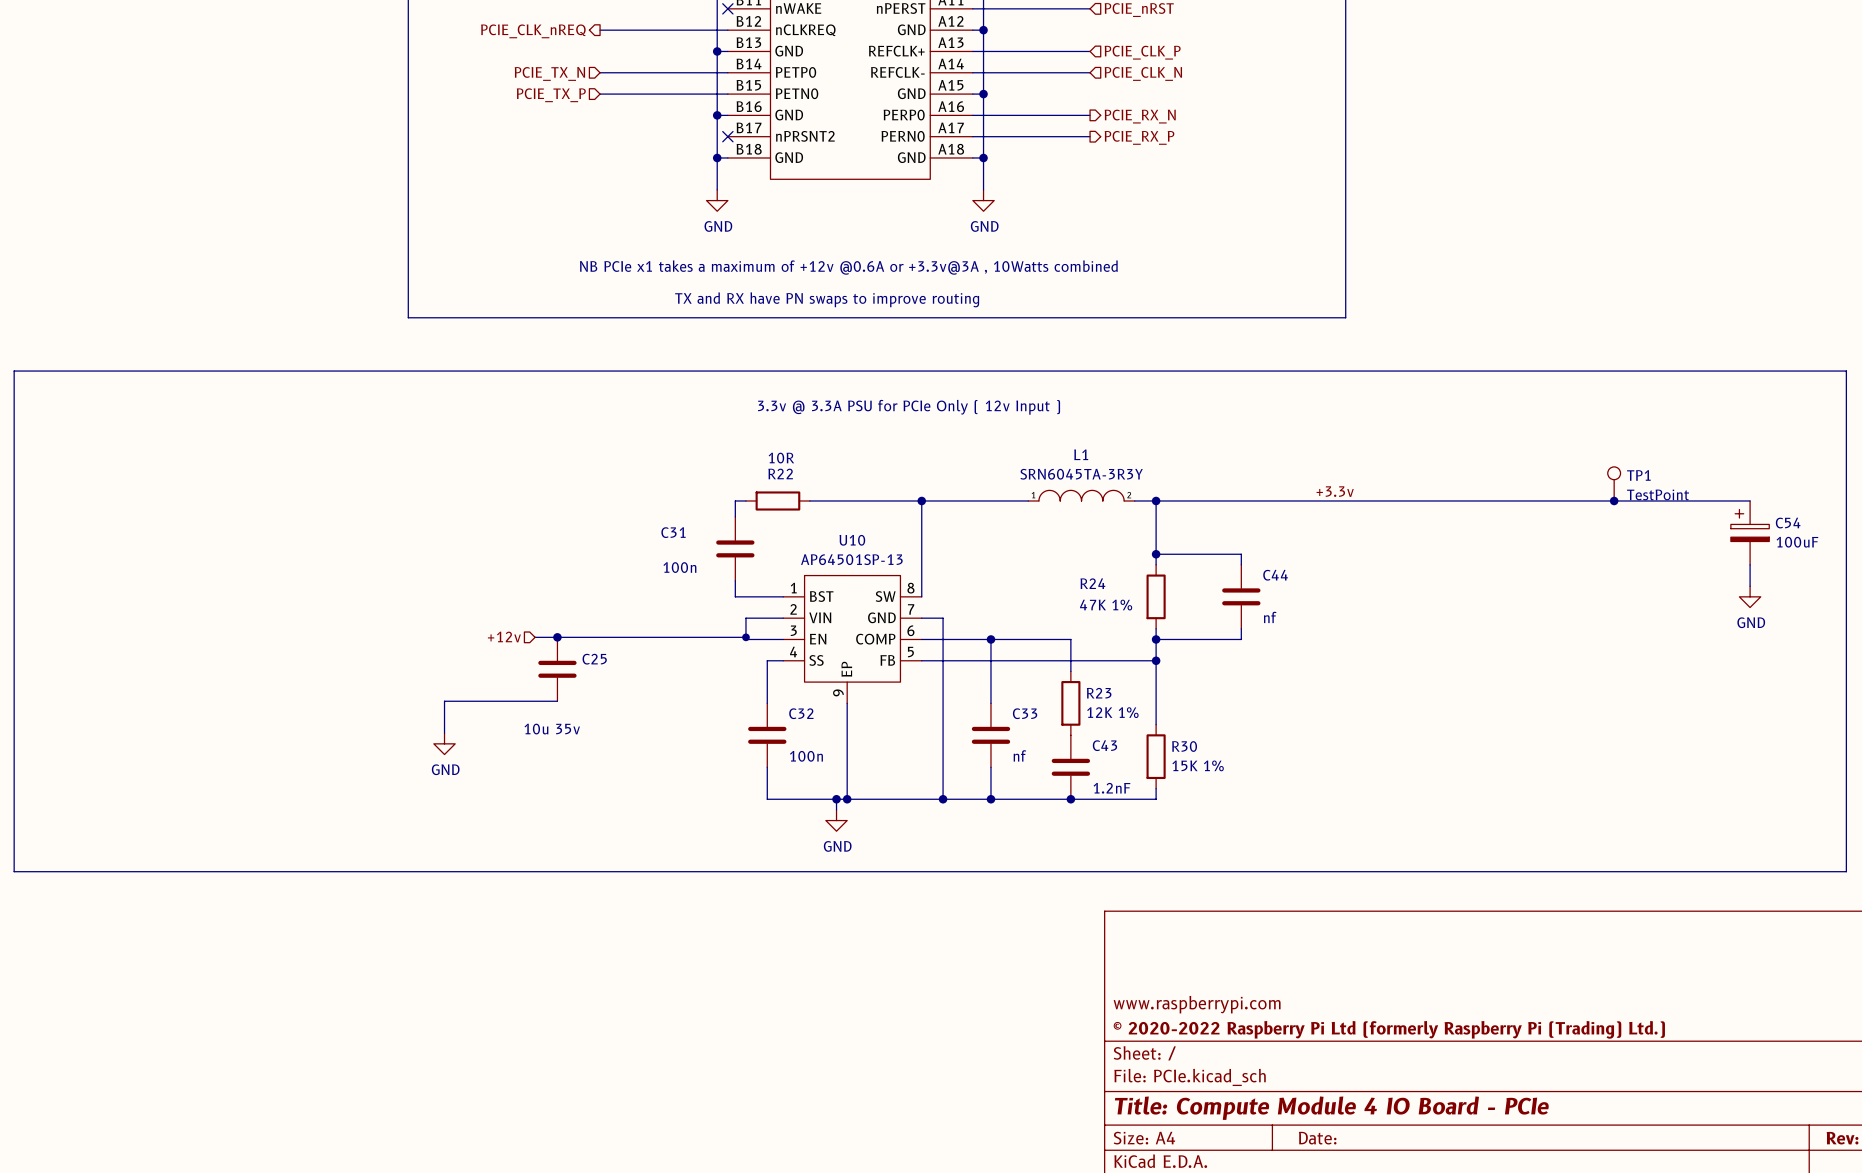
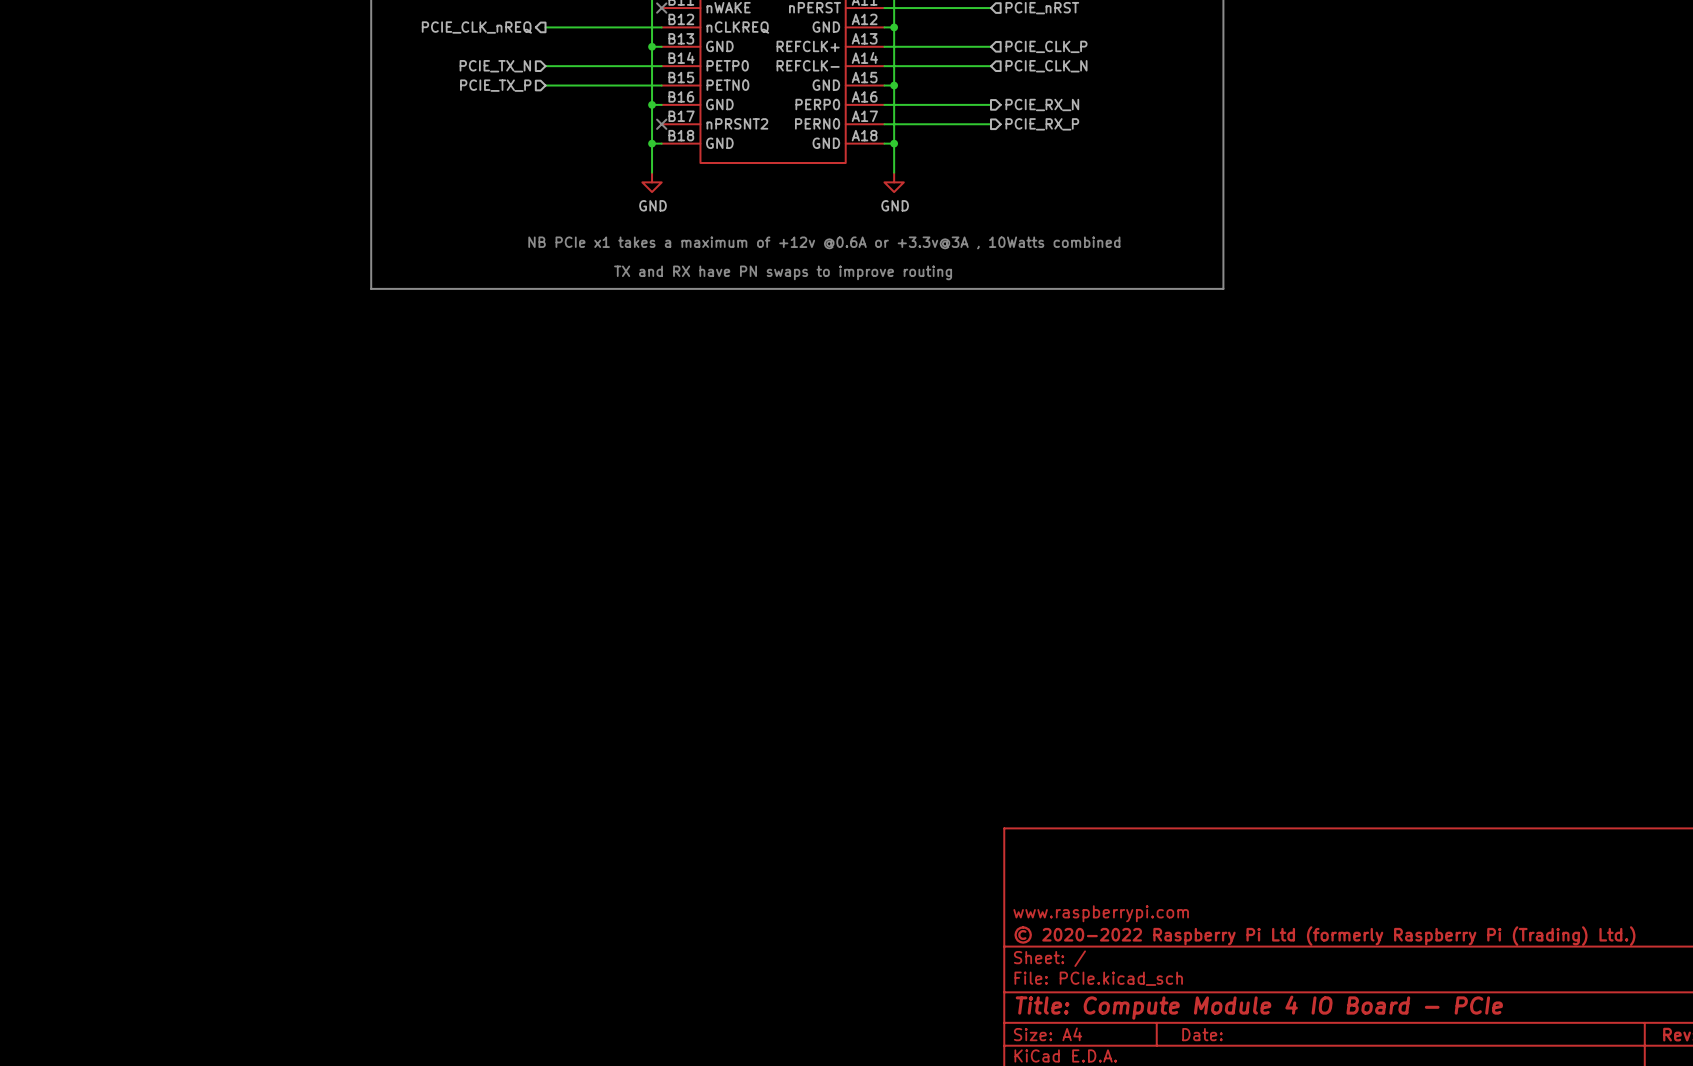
line: (14, 371) (1846, 371) (1846, 871) (14, 871) (14, 371) -> none
text: 3.3v @ 3.3A PSU for PCIe Only ( 12v Input ) (909, 407) -> none
TP1: TestPoint (1614, 483) -> none
label: +3.3v (1335, 491) -> none
L1: SRN6045TA-3R3Y (1081, 495) -> none
wire: (745, 500) (735, 500) (735, 516) -> none
R22: 10R (777, 500) -> none
wire: (809, 500) (1028, 500) -> none
wire: (921, 500) (921, 596) -> none
junction: (921, 500) -> none
wire: (1134, 500) (1750, 500) -> none
wire: (1156, 500) (1156, 564) -> none
junction: (1156, 500) -> none
junction: (1614, 500) -> none
C54: 100uF (1750, 532) -> none
C31: 100n (735, 548) -> none
wire: (1156, 554) (1241, 554) (1241, 564) -> none
junction: (1156, 554) -> none
wire: (1750, 564) (1750, 586) -> none
wire: (735, 580) (735, 596) (783, 596) -> none
R24: 47K 1% (1156, 596) -> none
C44: nf (1241, 596) -> none
power symbol: GND (1750, 596) -> none
wire: (783, 618) (745, 618) (745, 639) (783, 639) -> none
wire: (921, 618) (943, 618) (943, 799) -> none
wire: (1156, 628) (1156, 724) -> none
wire: (1241, 628) (1241, 639) (1156, 639) -> none
hierarchical label: +12v (504, 637) -> none
wire: (535, 637) (745, 637) -> none
junction: (557, 637) -> none
junction: (745, 637) -> none
U10: AP64501SP-13 (852, 639) -> none
wire: (921, 639) (1070, 639) (1070, 671) -> none
wire: (990, 639) (990, 703) -> none
junction: (990, 639) -> none
junction: (1156, 639) -> none
wire: (783, 660) (767, 660) (767, 703) -> none
wire: (921, 660) (1156, 660) -> none
junction: (1156, 660) -> none
C25: 10u 35v (557, 669) -> none
wire: (557, 701) (444, 701) (444, 733) -> none
wire: (847, 703) (847, 799) -> none
R23: 12K 1% (1070, 703) -> none
C32: 100n (767, 735) -> none
C33: nf (990, 735) -> none
power symbol: GND (444, 743) -> none
R30: 15K 1% (1156, 756) -> none
wire: (767, 767) (767, 799) (1156, 799) (1156, 788) -> none
wire: (990, 767) (990, 799) -> none
C43: 1.2nF (1070, 767) -> none
wire: (836, 799) (836, 809) -> none
junction: (836, 799) -> none
junction: (847, 799) -> none
junction: (943, 799) -> none
junction: (990, 799) -> none
junction: (1070, 799) -> none
power symbol: GND (836, 820) -> none

